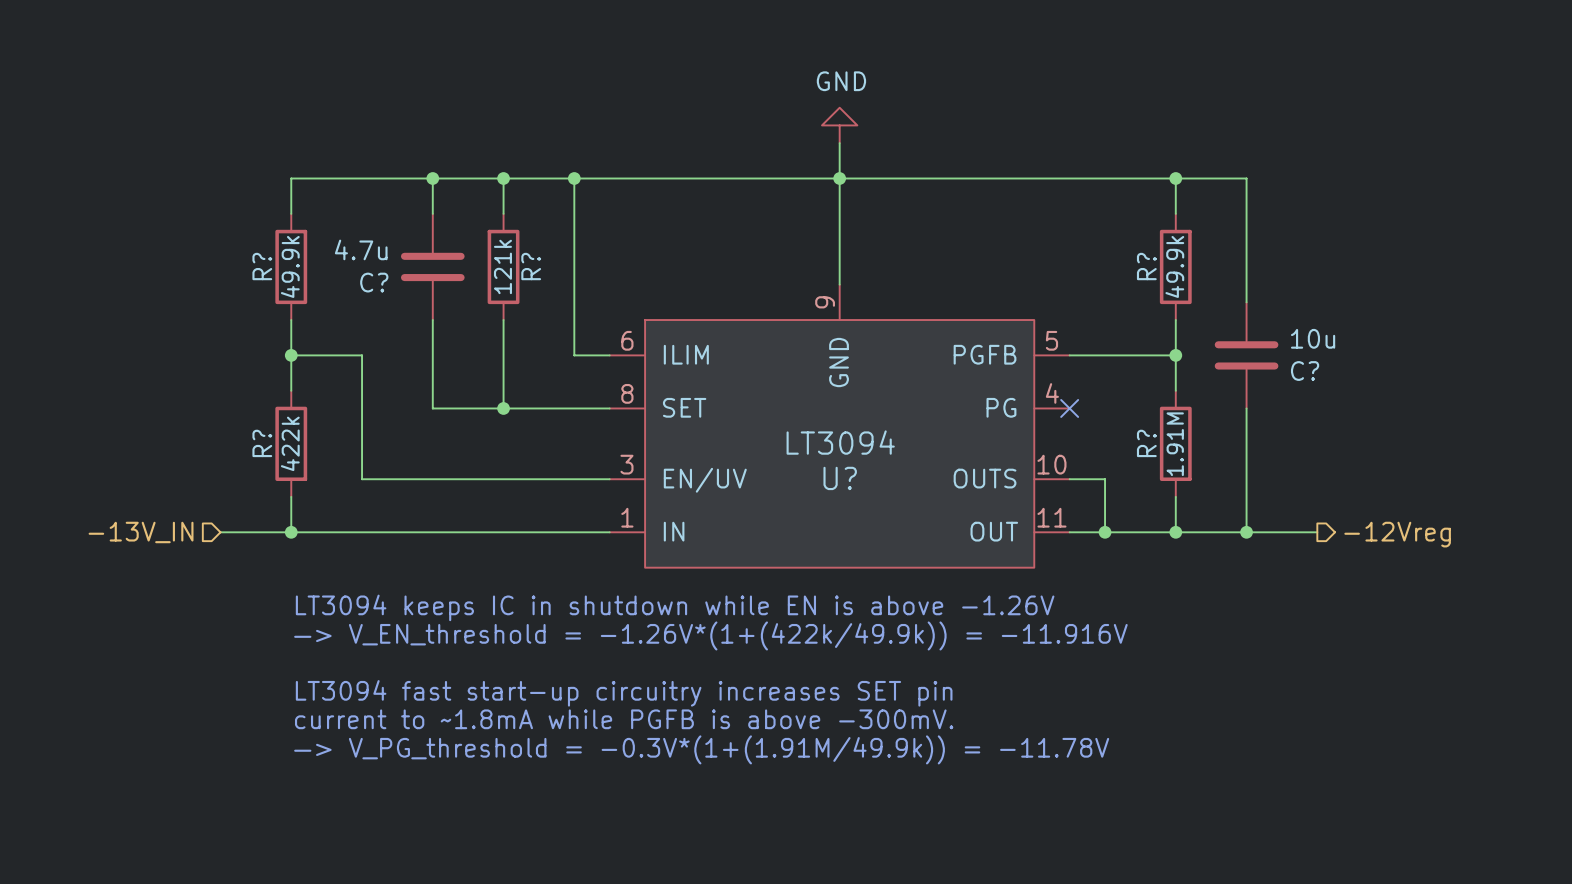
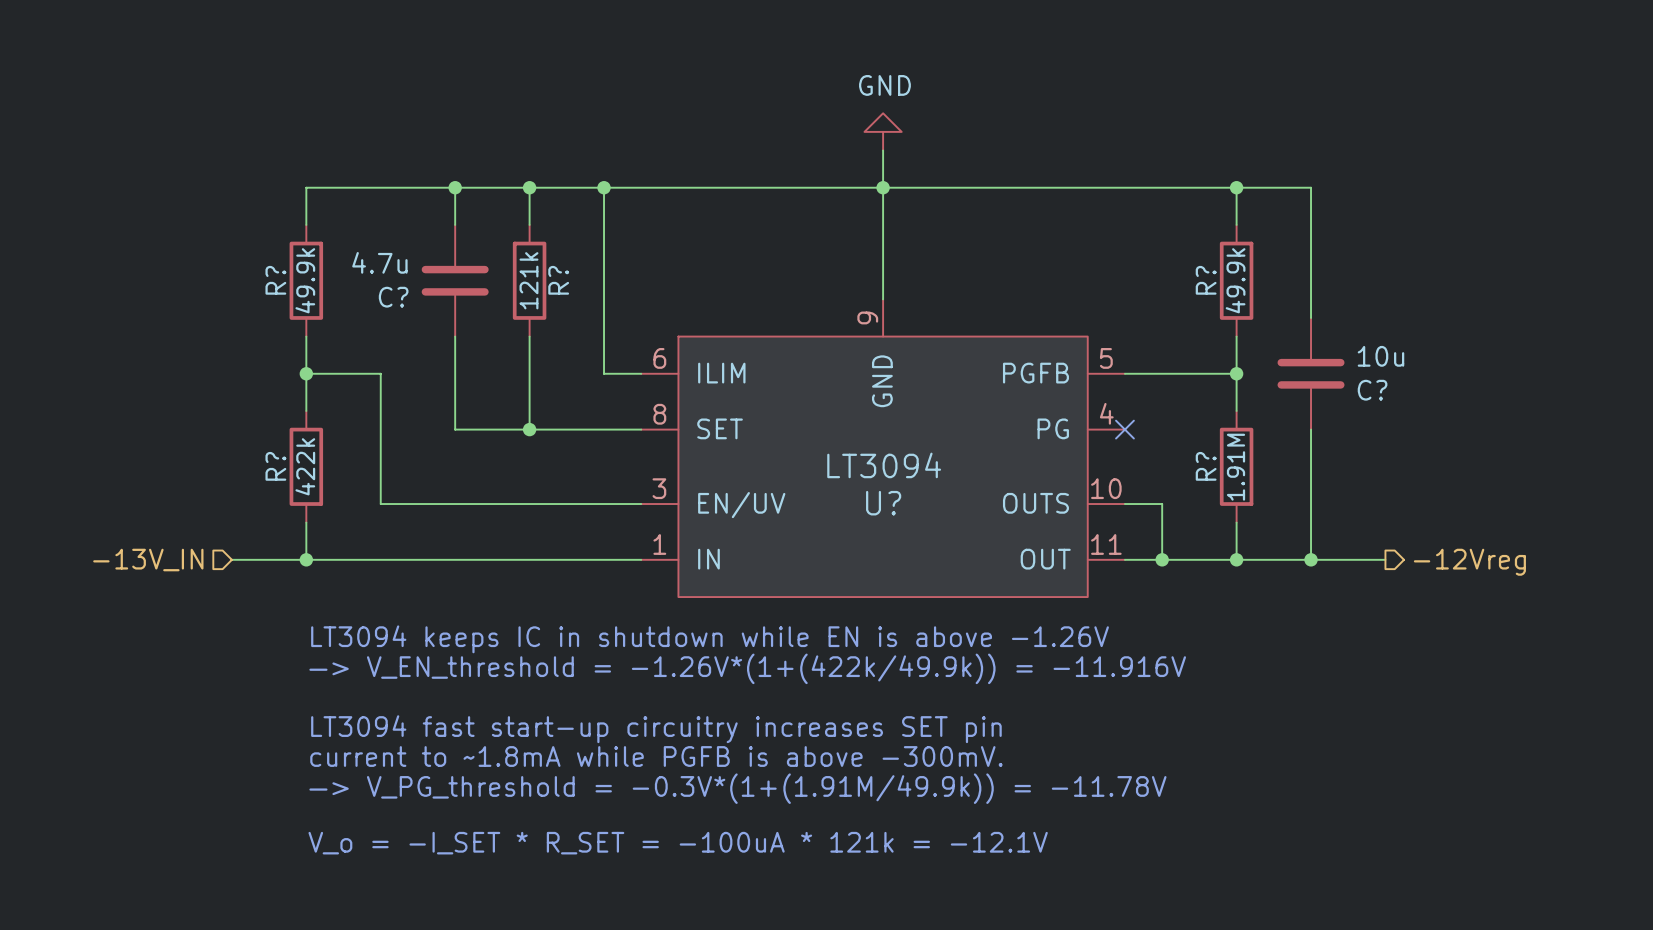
text: none -> V_o = -I_SET * R_SET = -100uA * 121k = -12.1V (678, 843)

